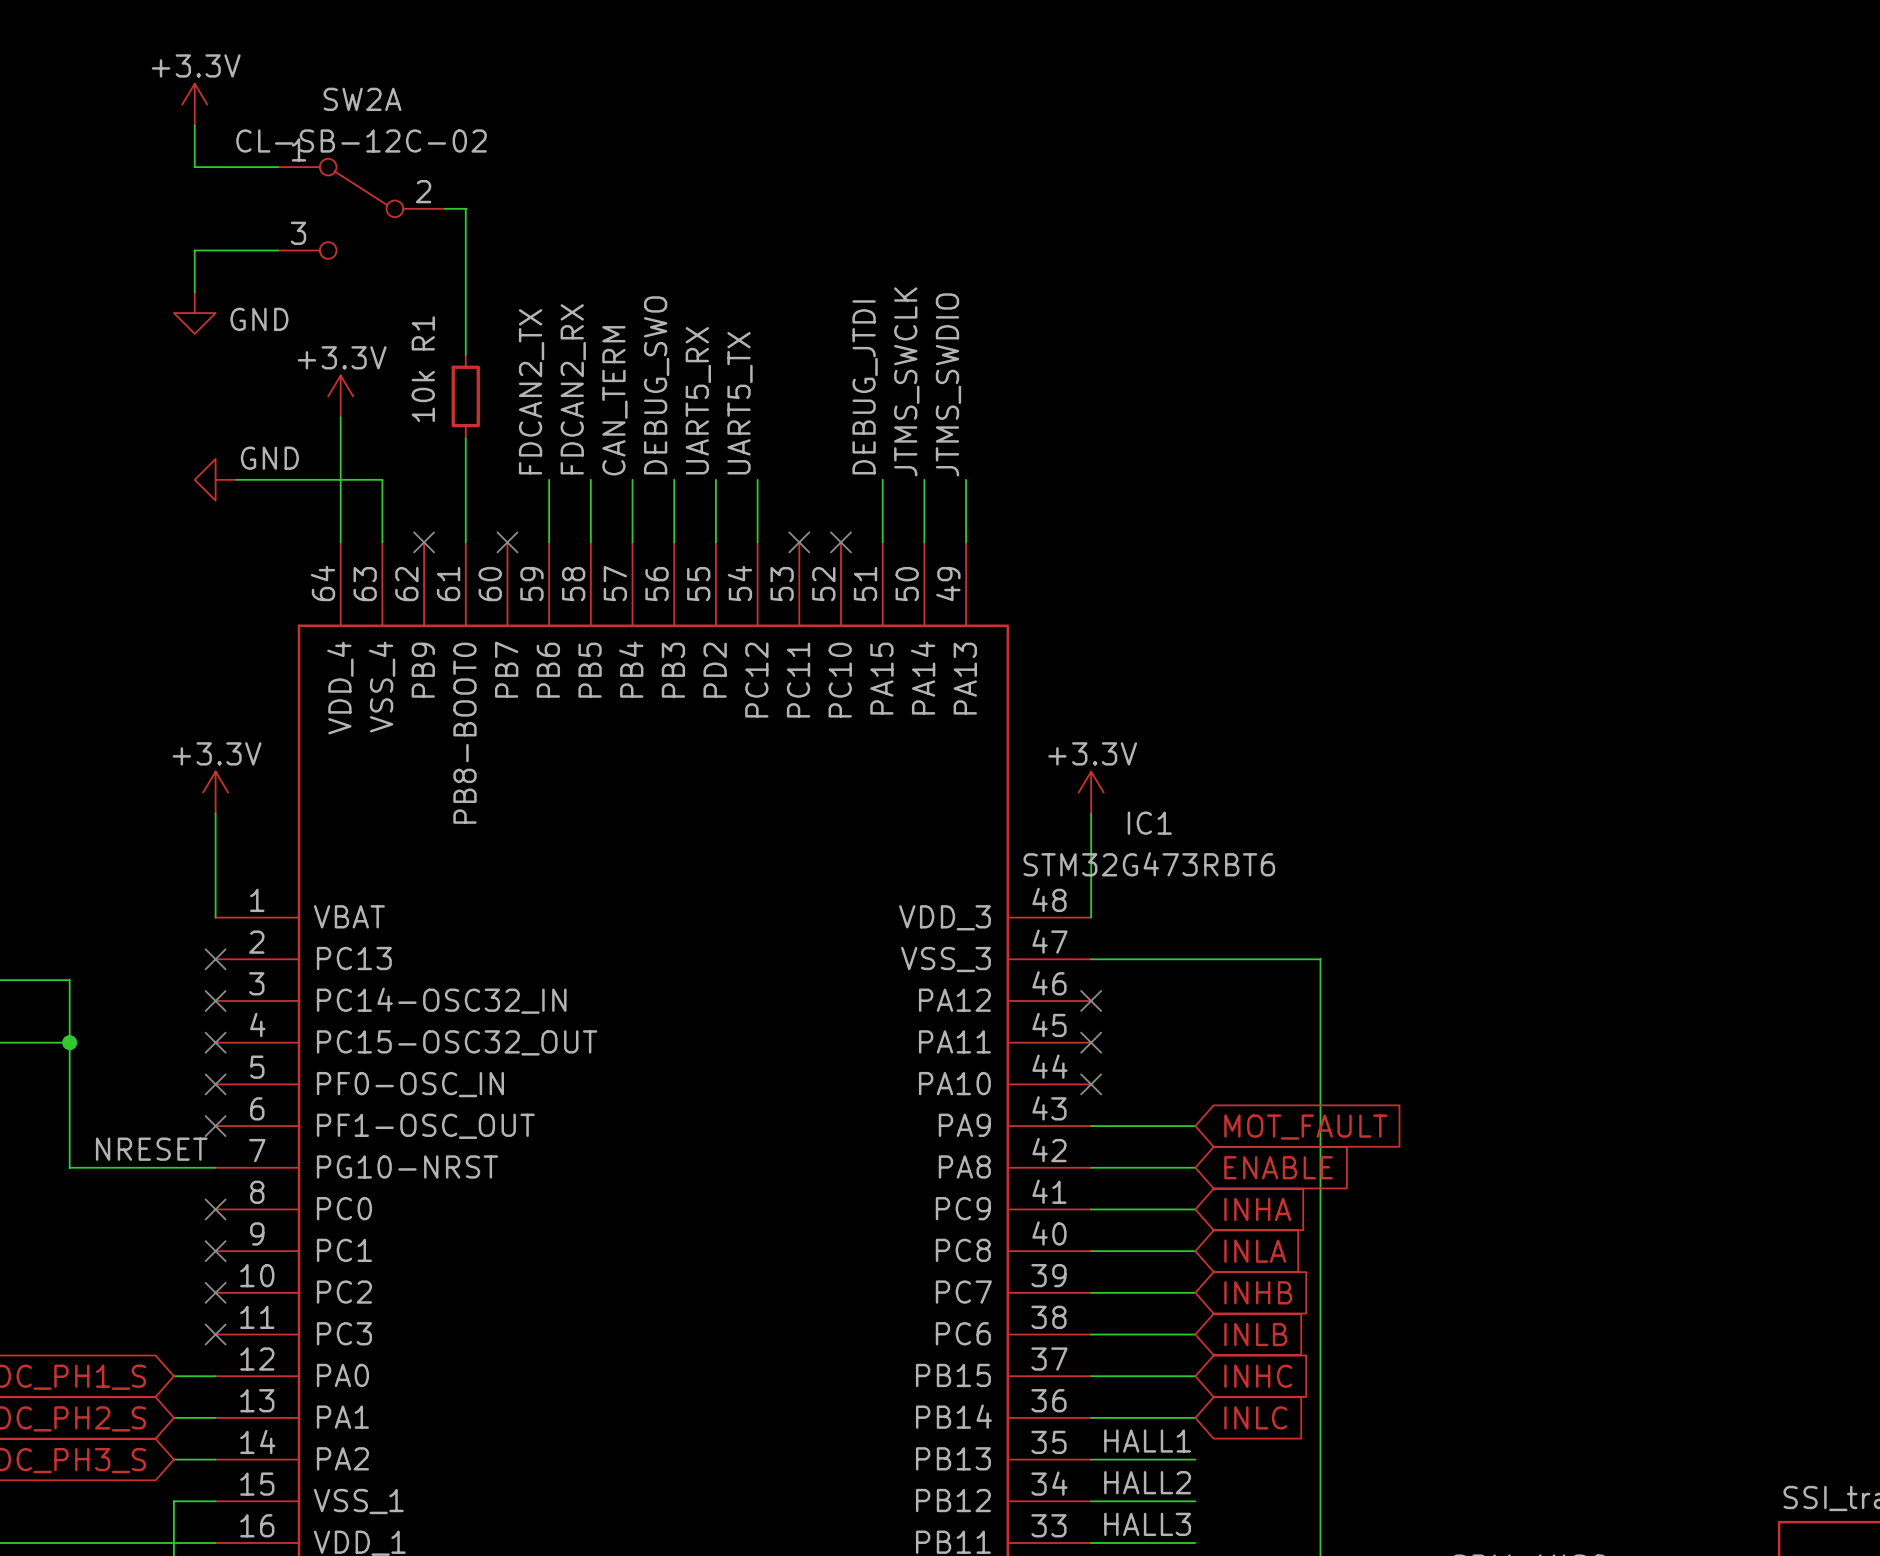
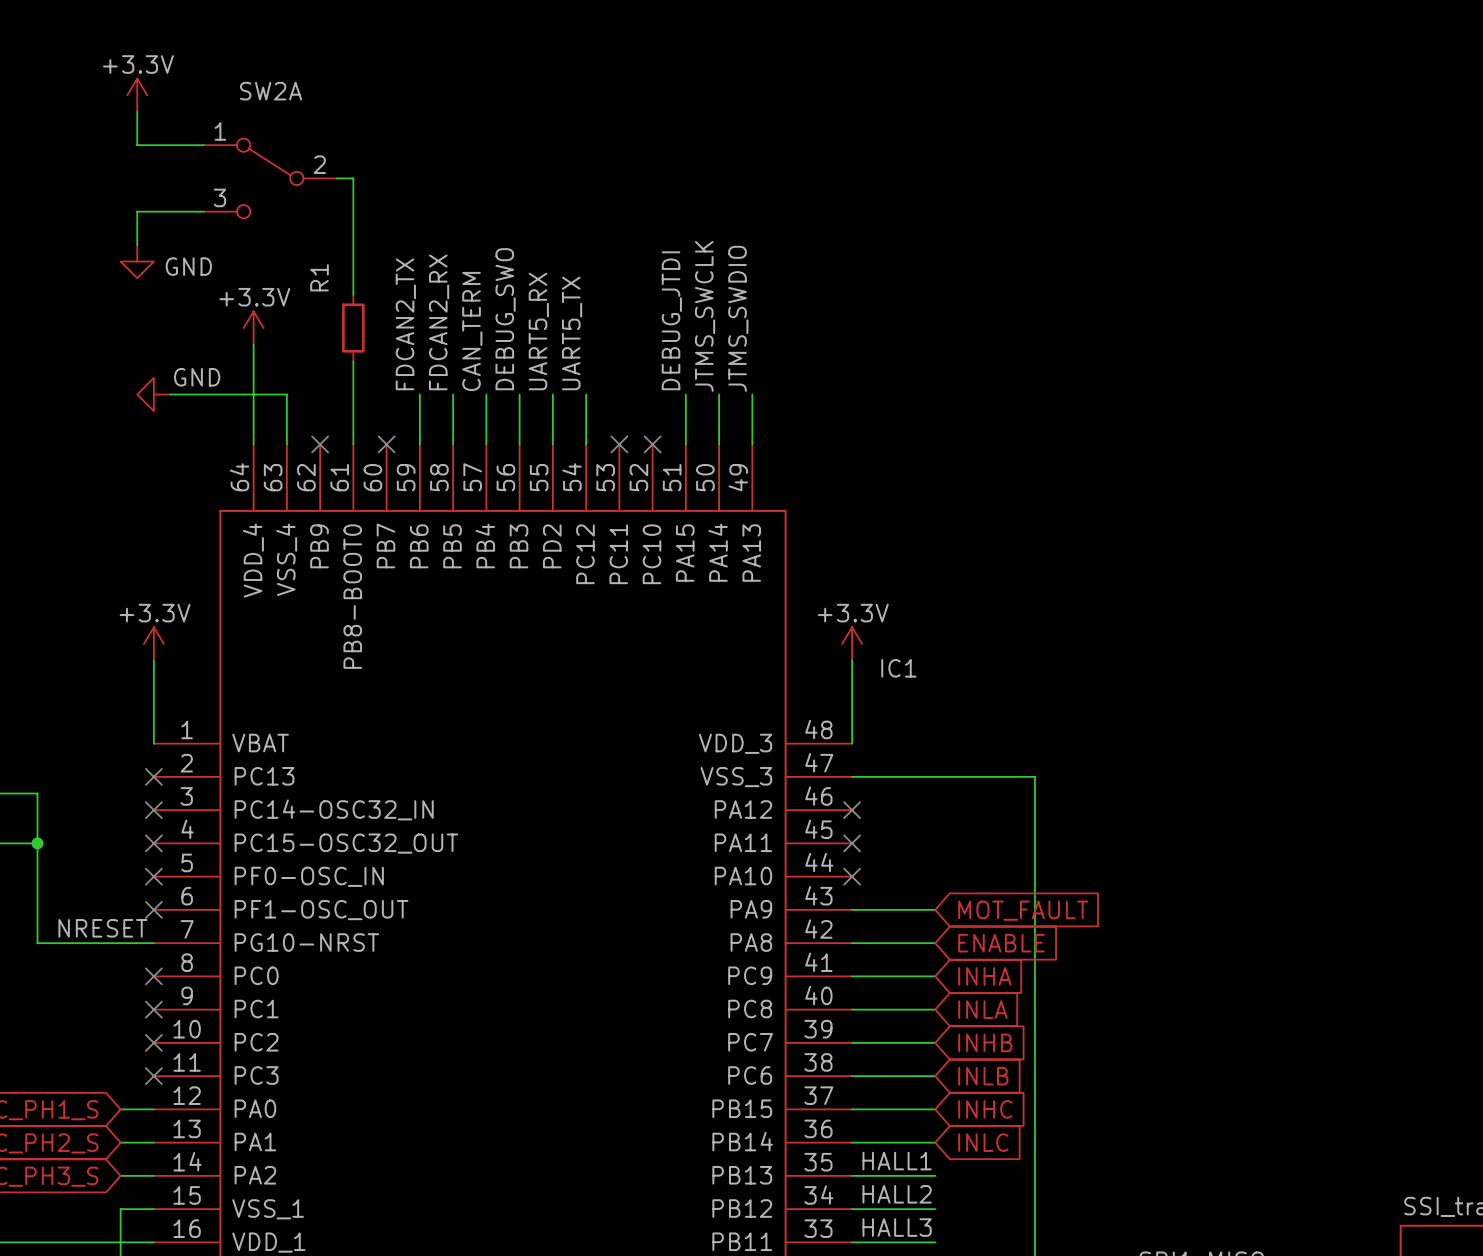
SW2A value: CL-SB-12C-02 (361, 141) -> none
R1 value: 10k (423, 396) -> none
IC1 value: STM32G473RBT6 (1149, 864) -> none

